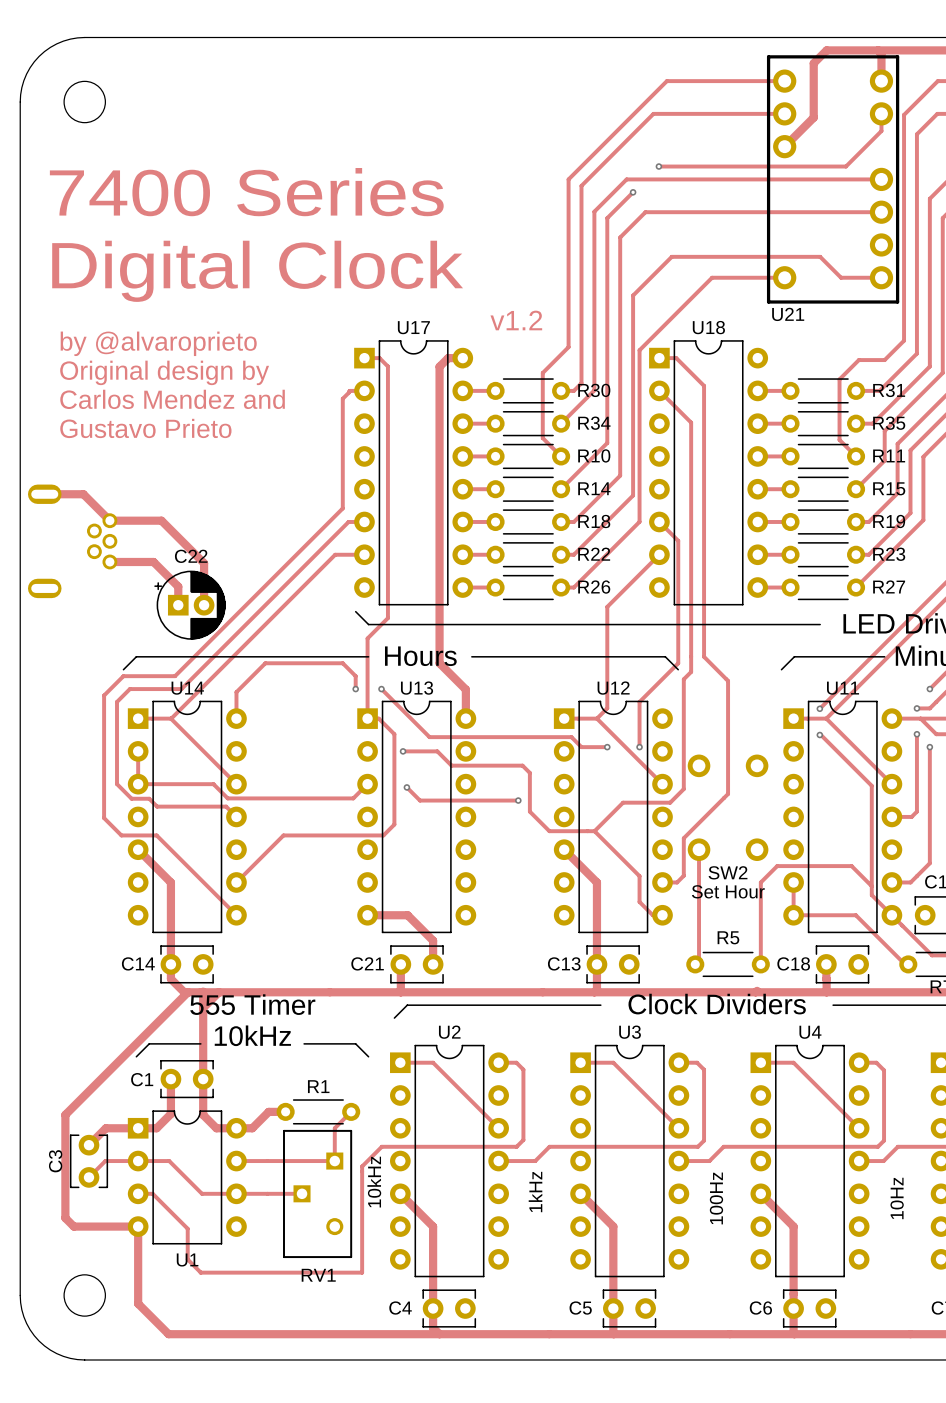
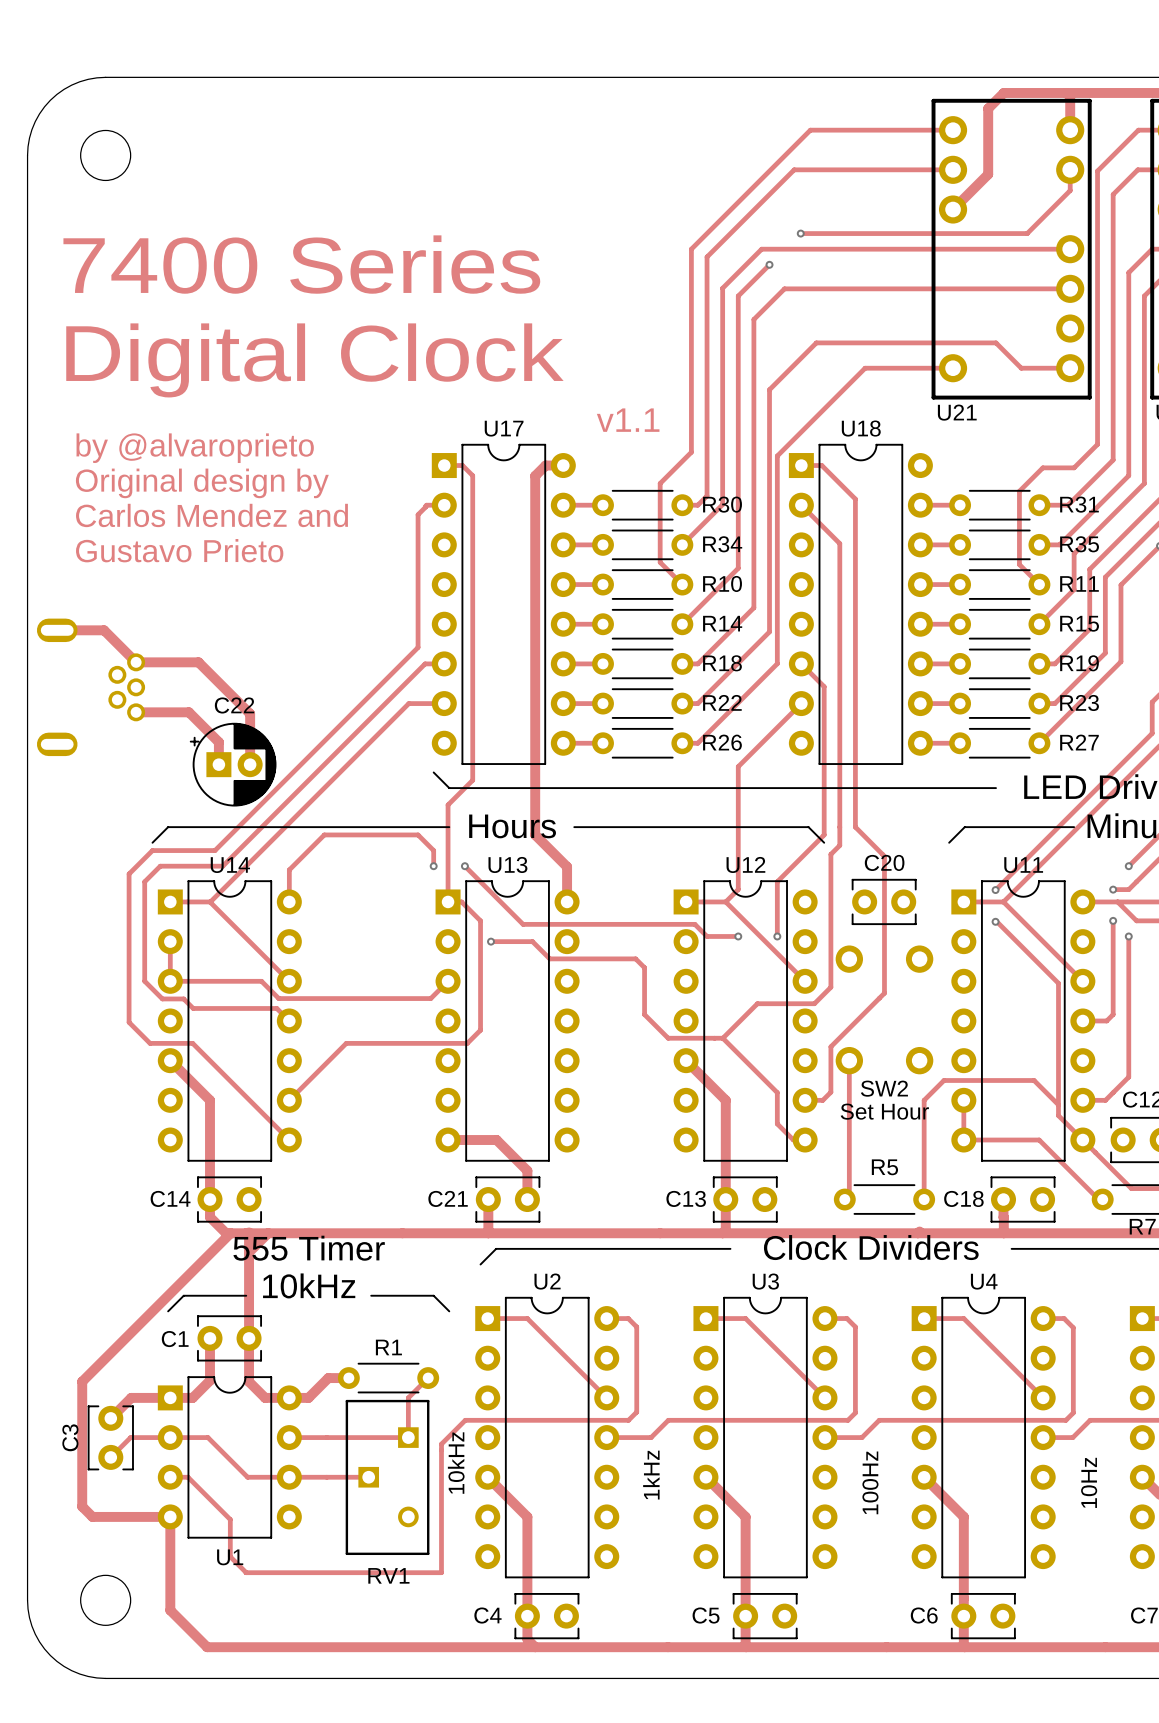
text: v1.2 (516, 320) -> v1.1 (628, 420)
C20: none -> (884, 901)
track: (406, 787) (420, 800) (518, 800) -> none
via: (406, 787) -> none
via: (518, 800) -> none

